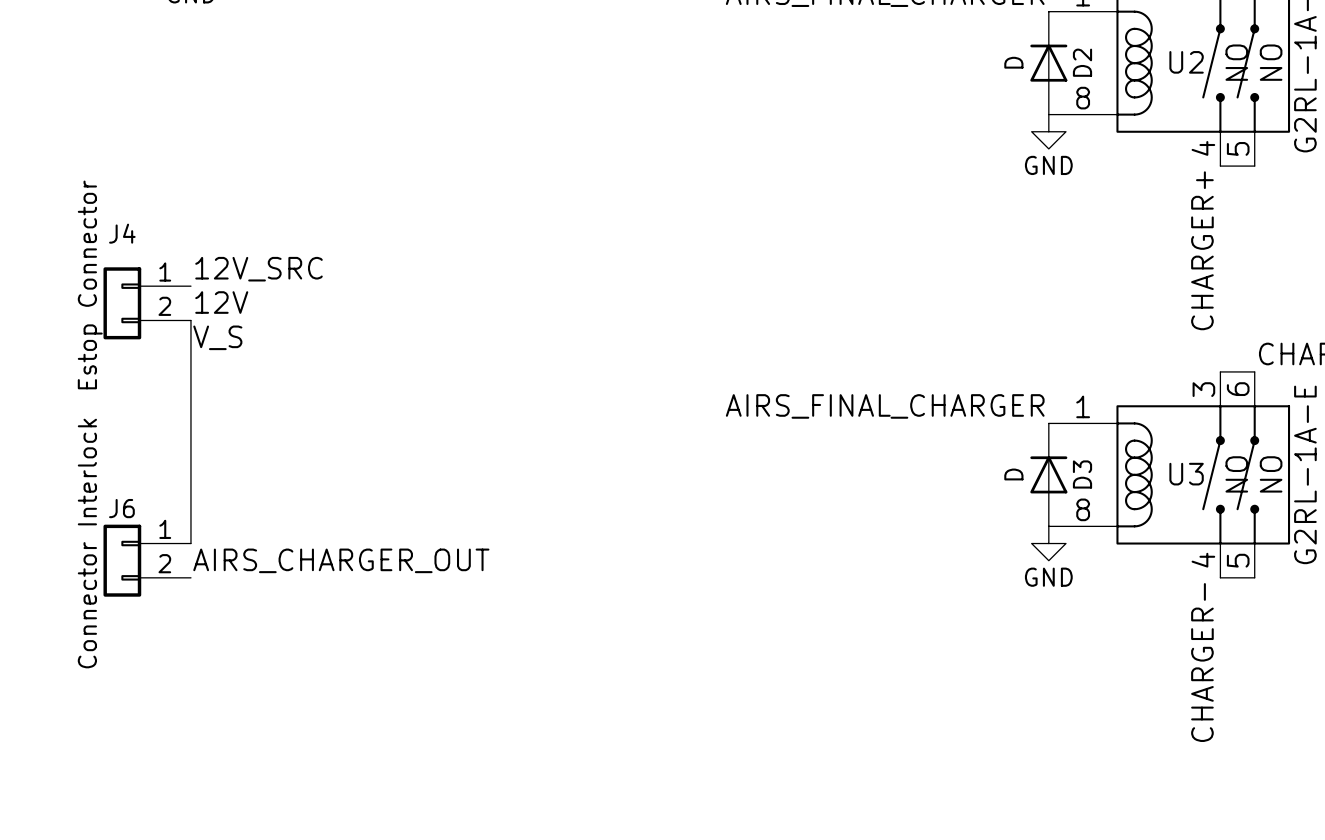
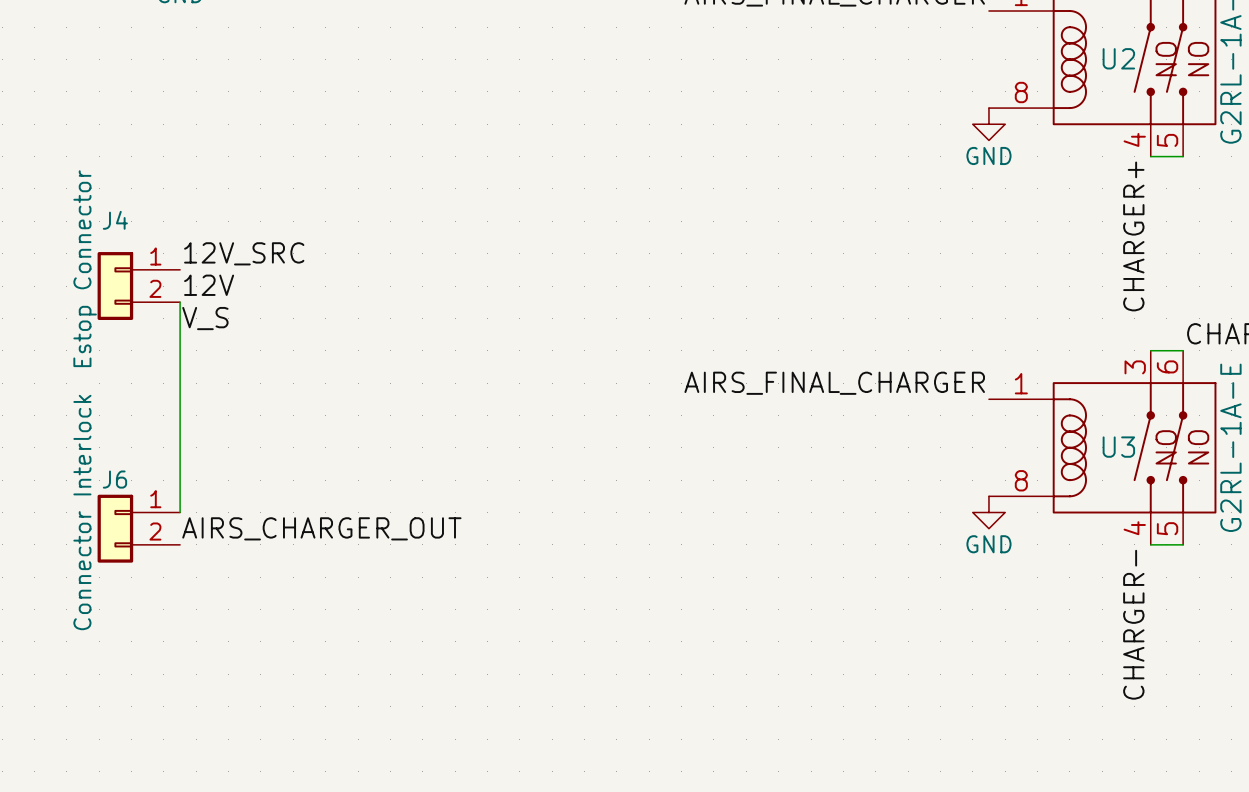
D2: D (1048, 63) -> none
D3: D (1048, 474) -> none

